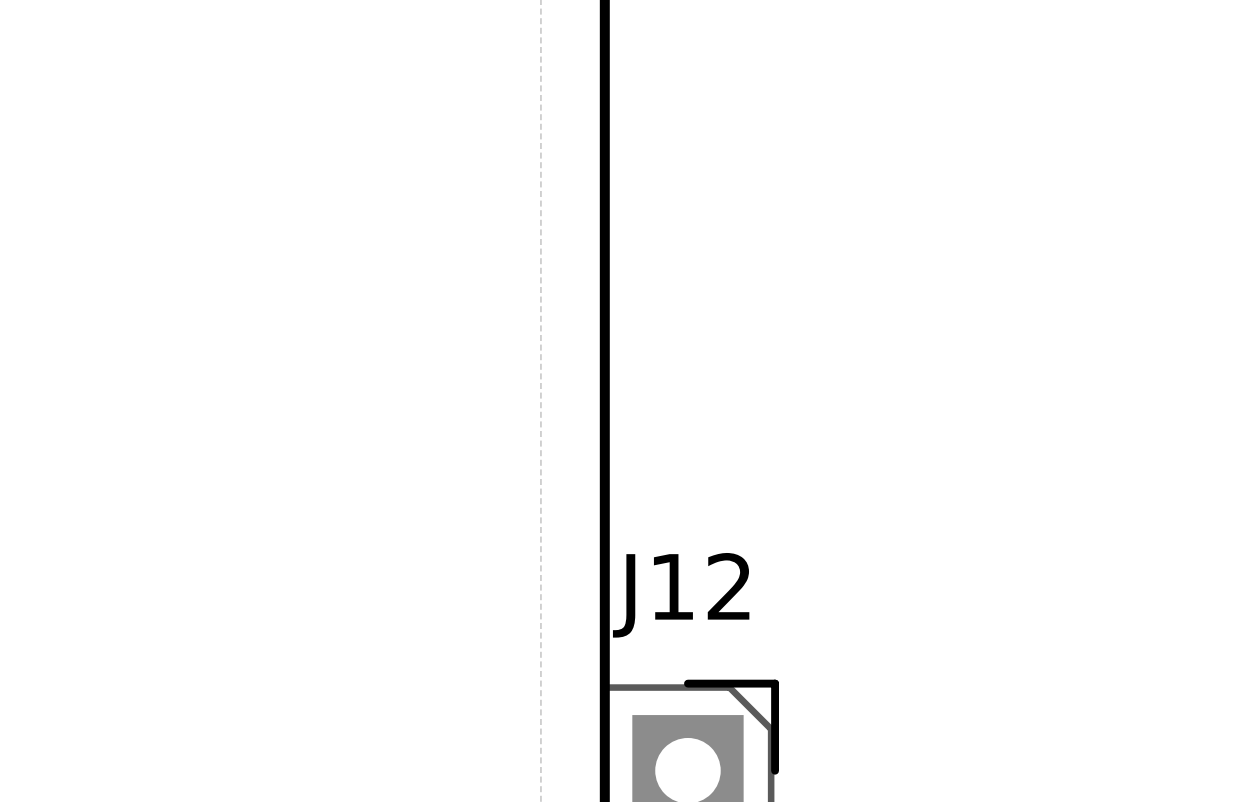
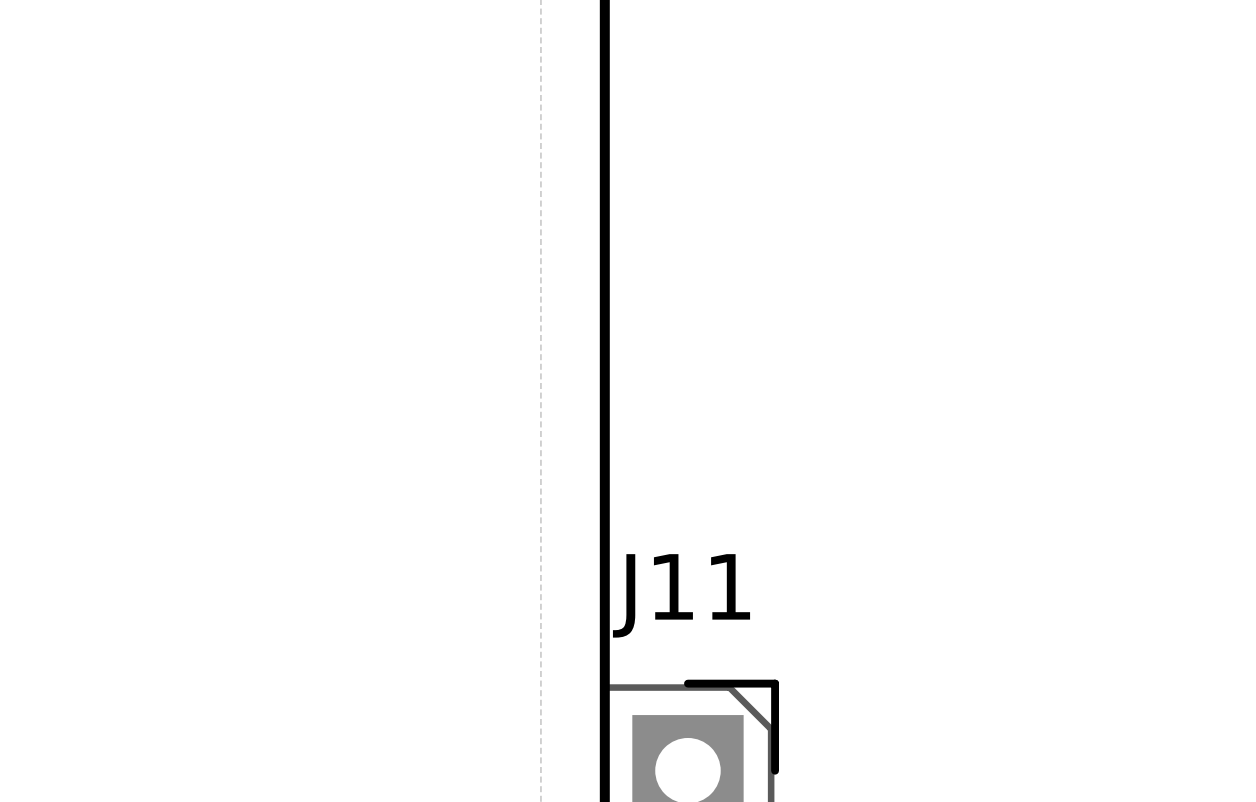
J12 name: J12 (681, 595) -> J11 (681, 595)

